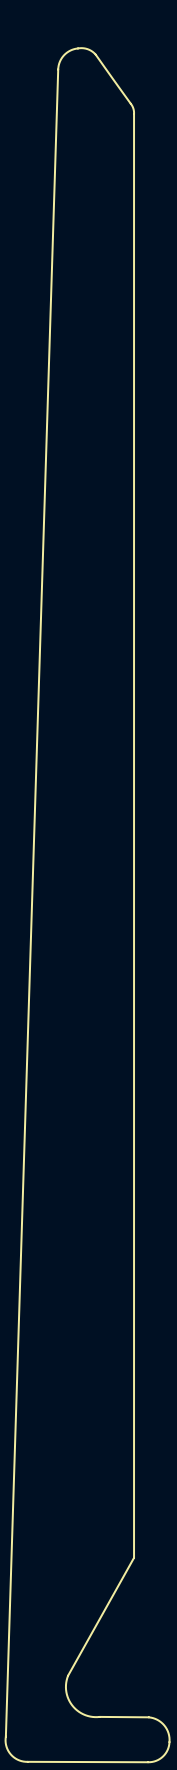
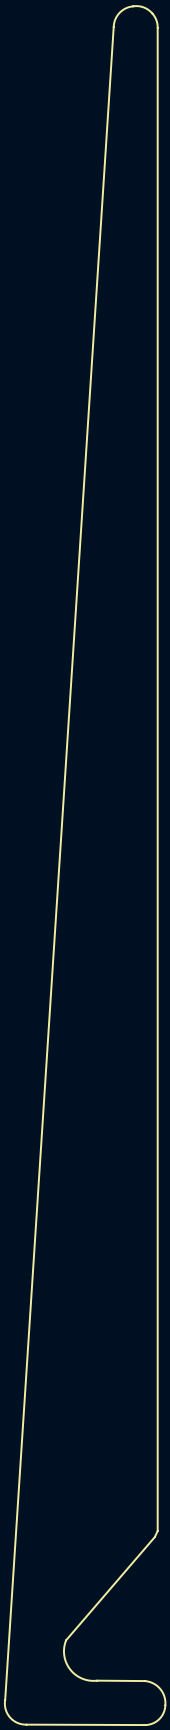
line: (68, 1675) (134, 1557) (134, 112) (131, 104) (95, 54) (89, 49) (81, 48) (72, 49) (65, 53) (60, 60) (58, 69) (5, 1736) -> (66, 1640) (154, 1537) (157, 1530) (157, 27) (156, 20) (151, 12) (145, 8) (136, 6) (127, 7) (120, 11) (113, 25) (5, 1700)

